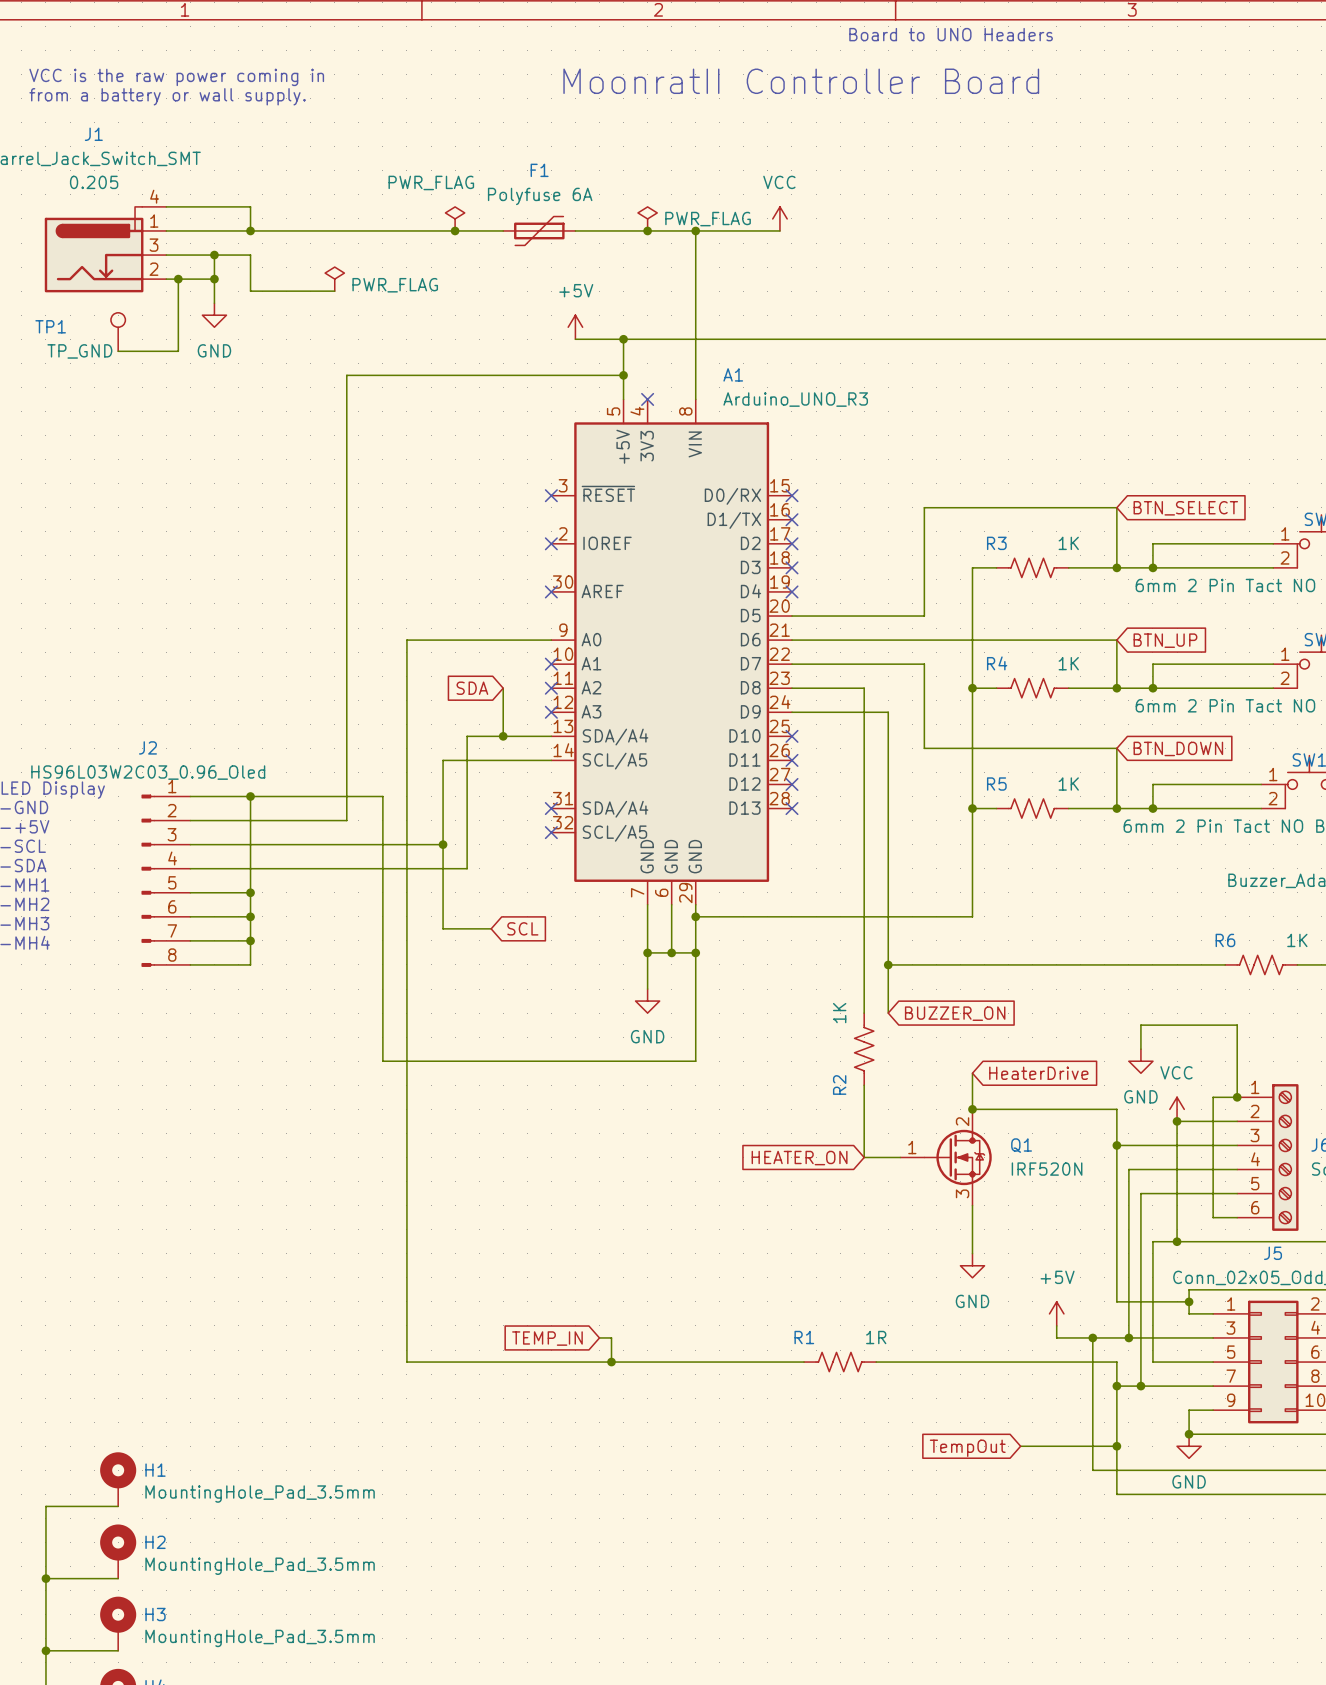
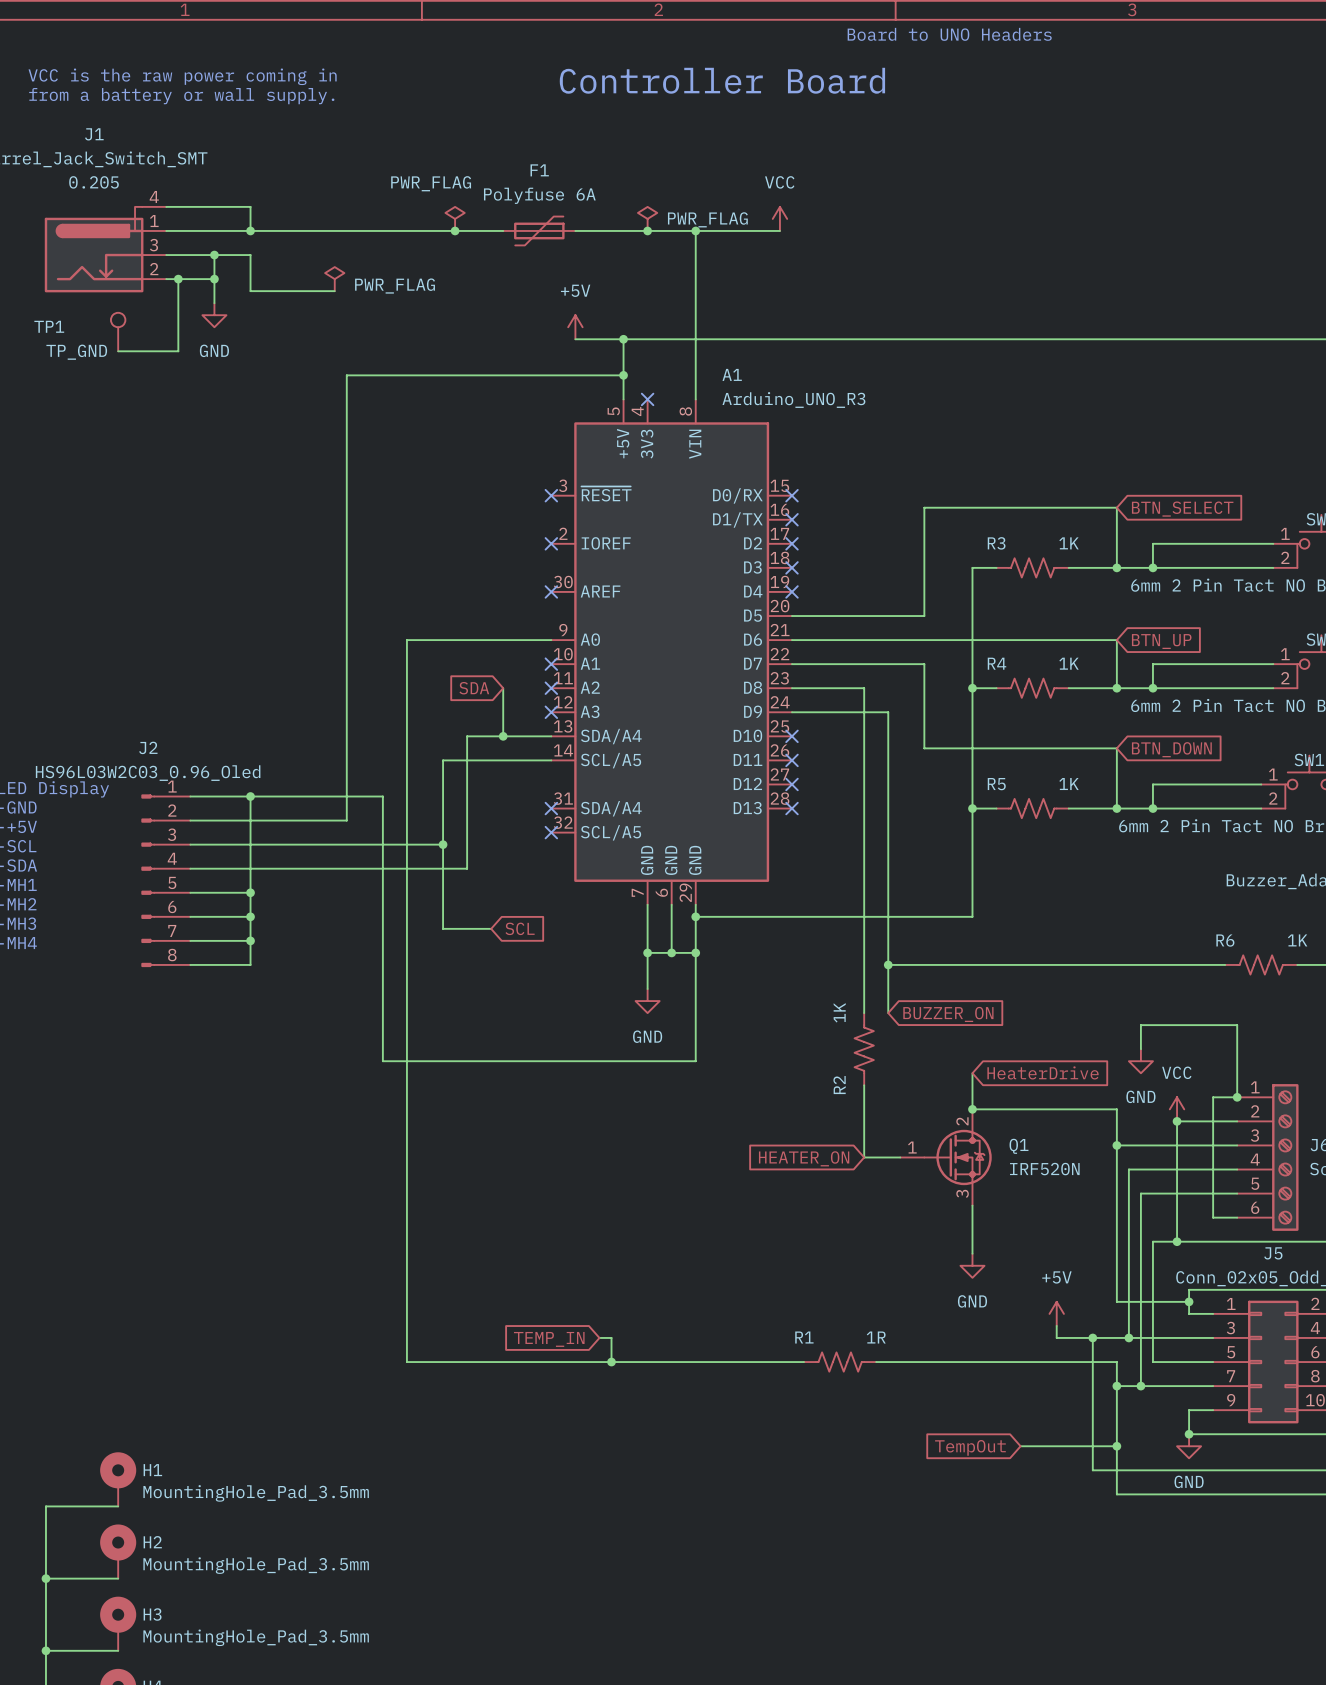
text: MoonratII Controller Board (801, 81) -> Controller Board (722, 80)

